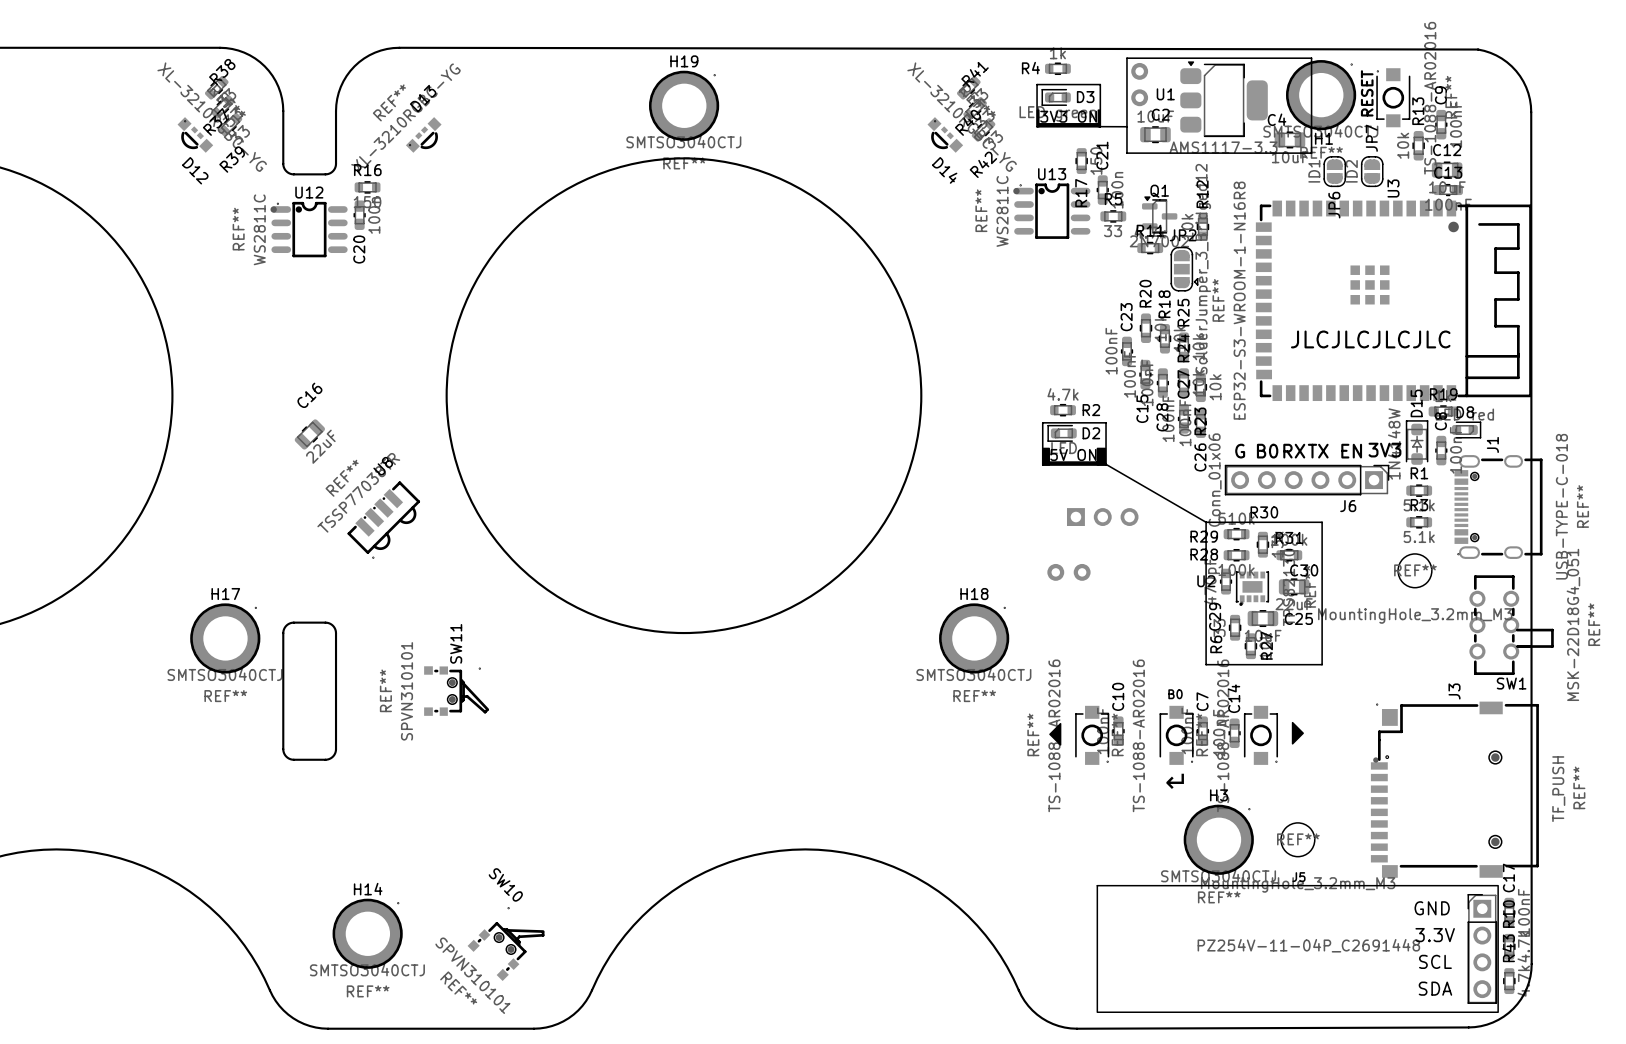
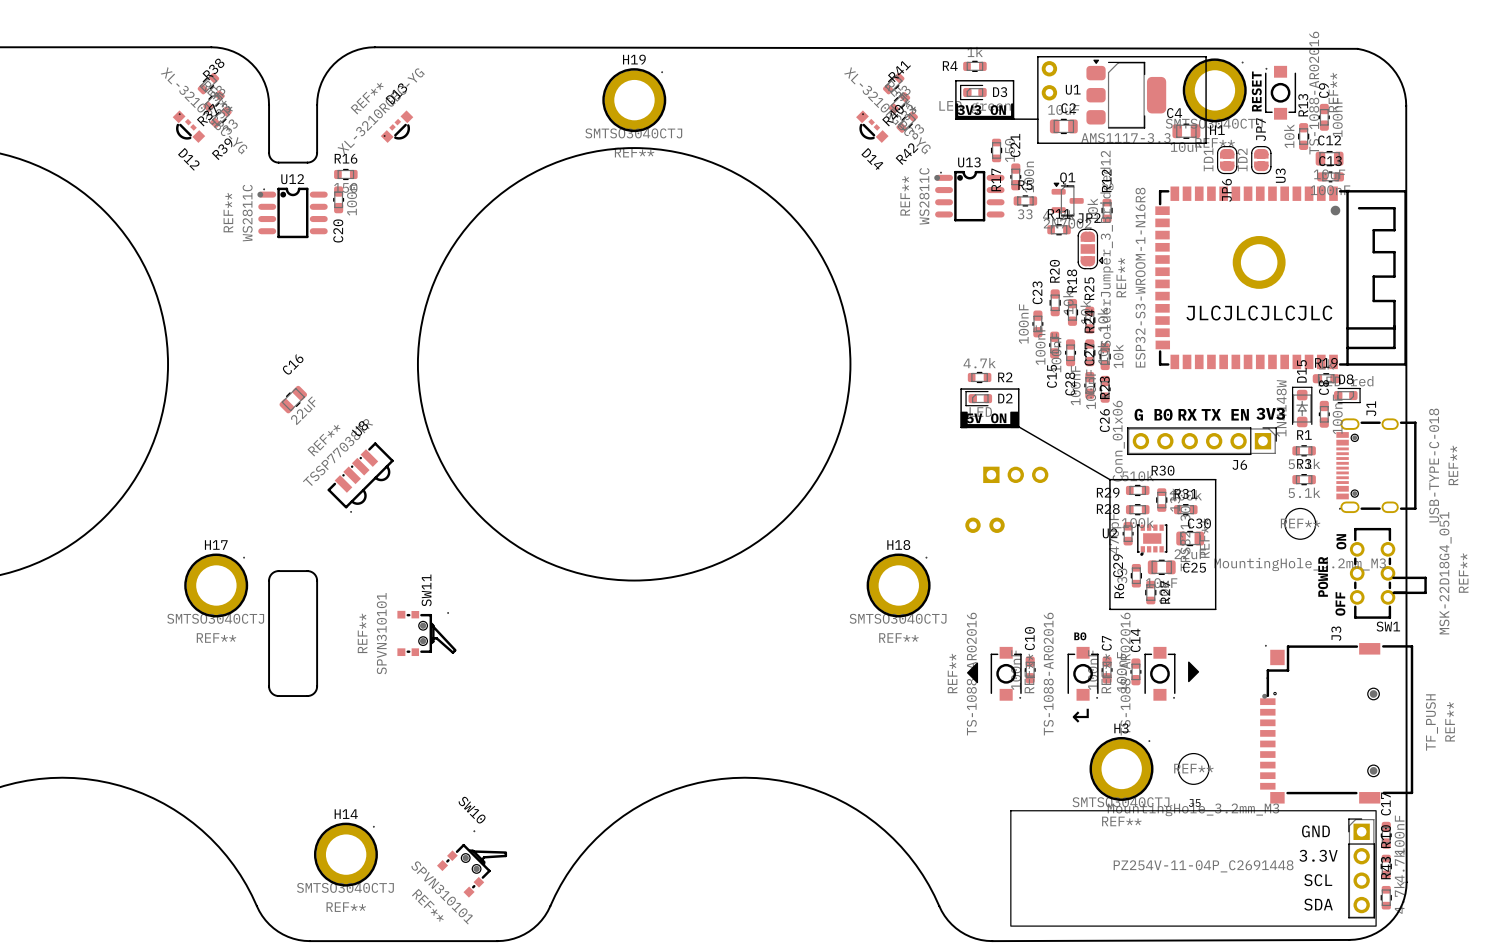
U3 footprint: [1255, 200, 1532, 402] -> [1155, 186, 1407, 370]
text: none -> ON (1341, 541)
text: none -> POWER (1323, 576)
text: none -> OFF (1340, 603)

